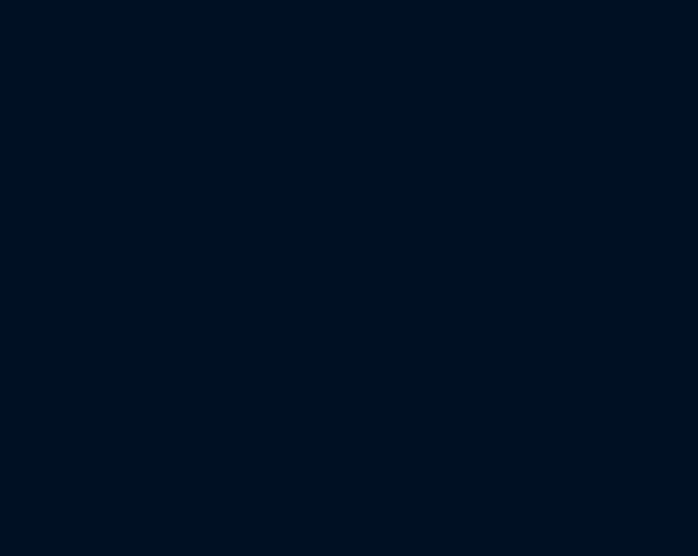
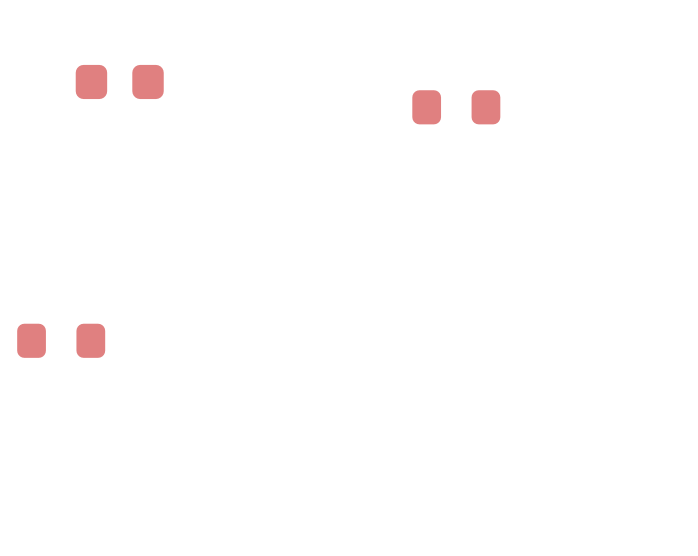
part: none -> (119, 81)
part: none -> (456, 107)
part: none -> (61, 340)

